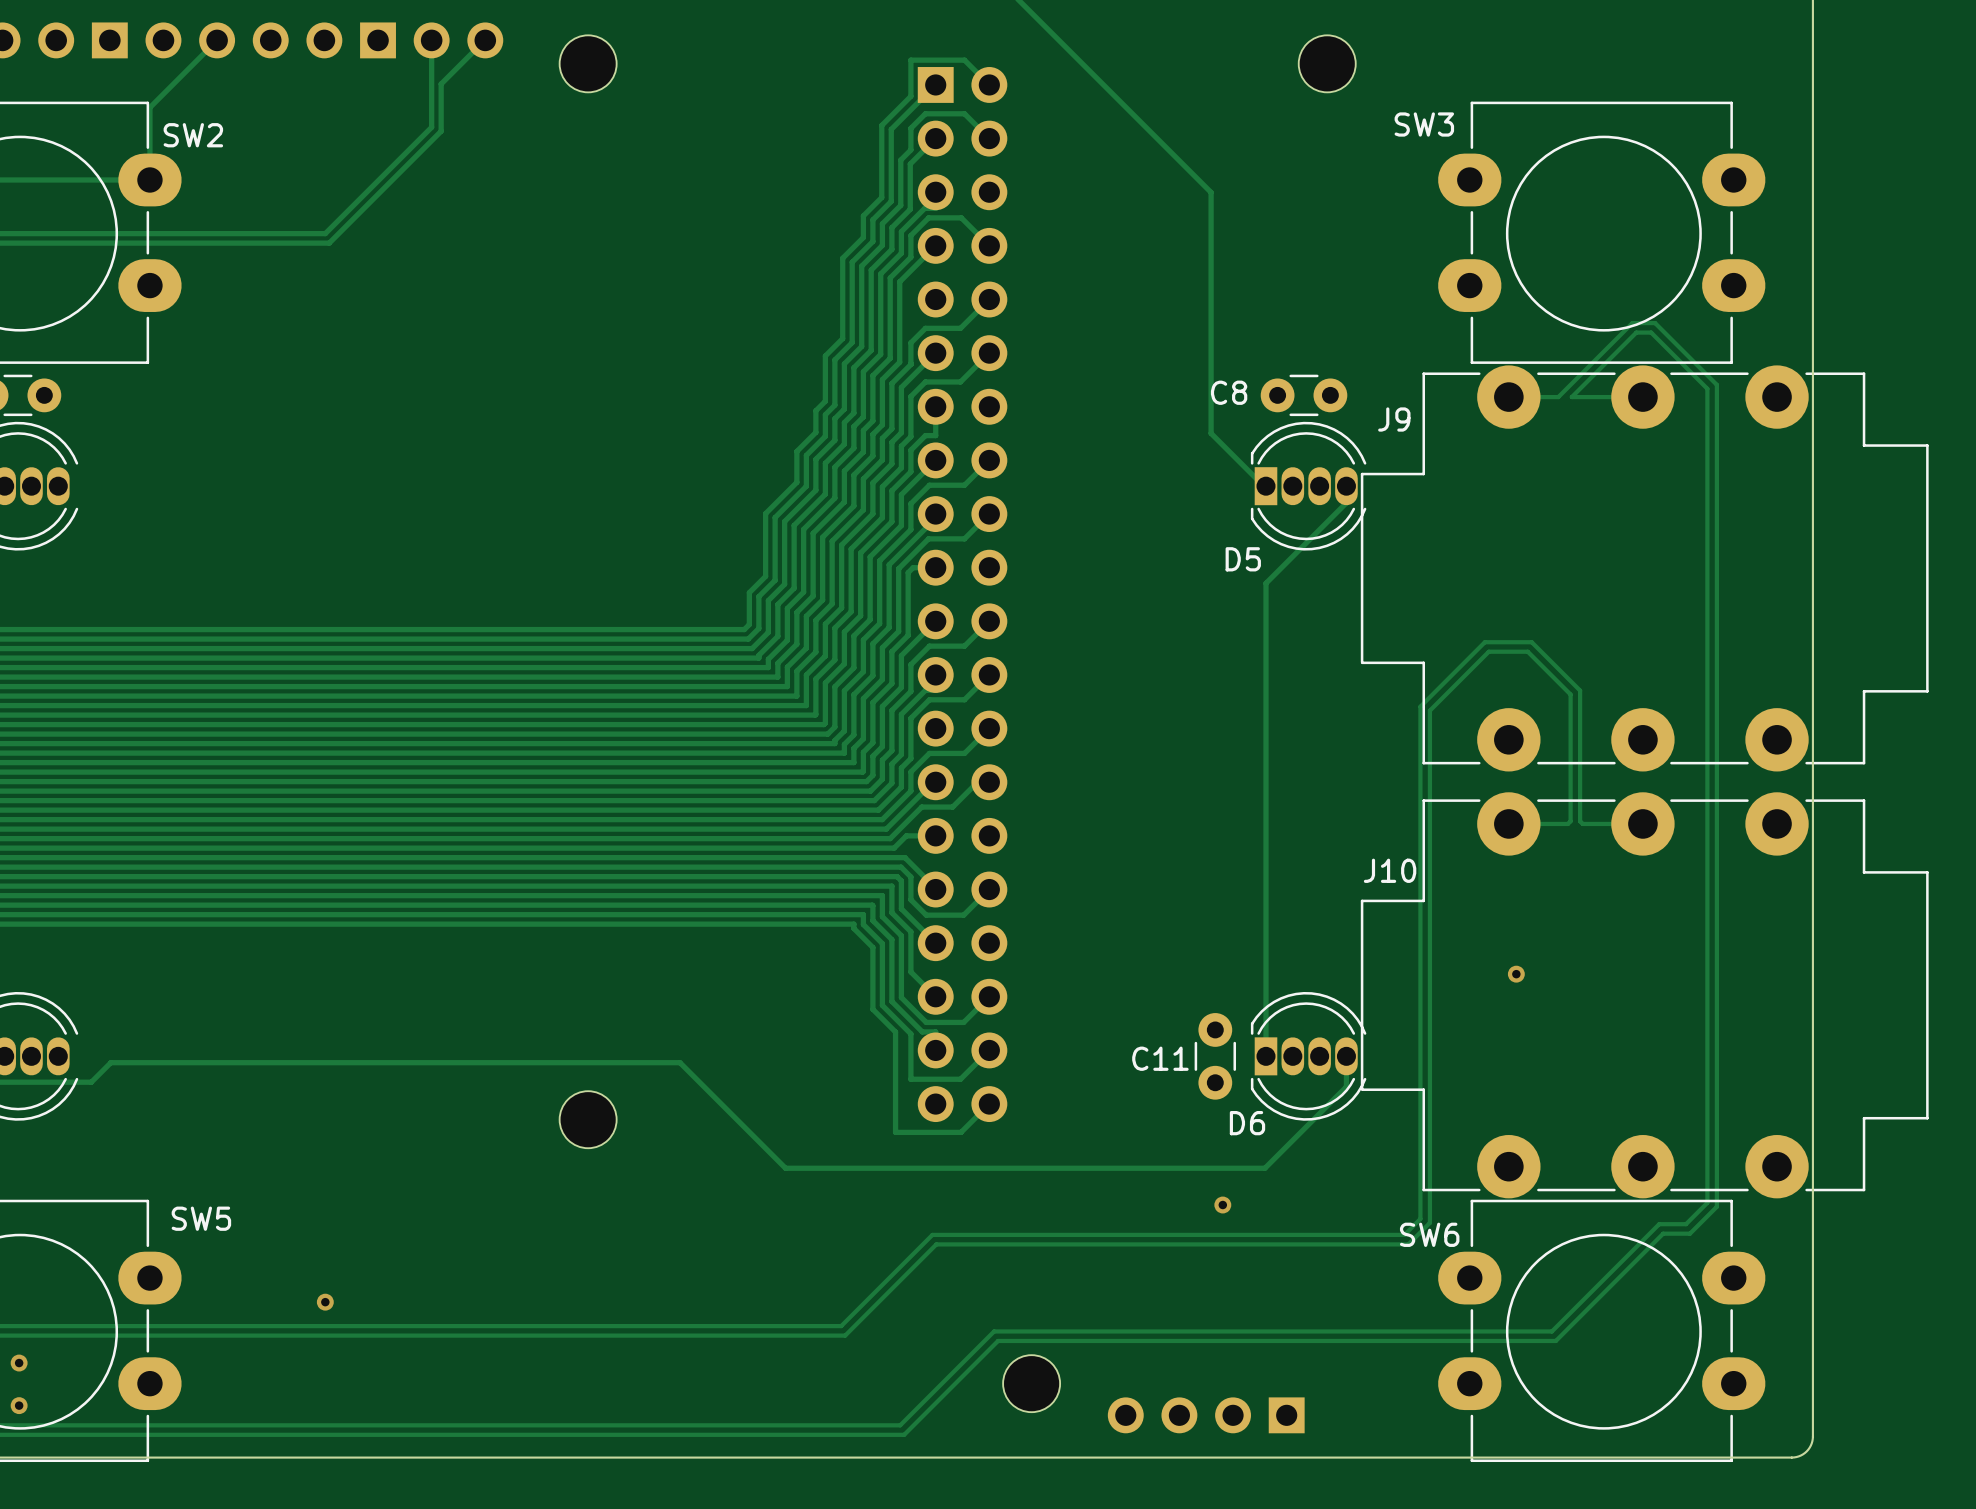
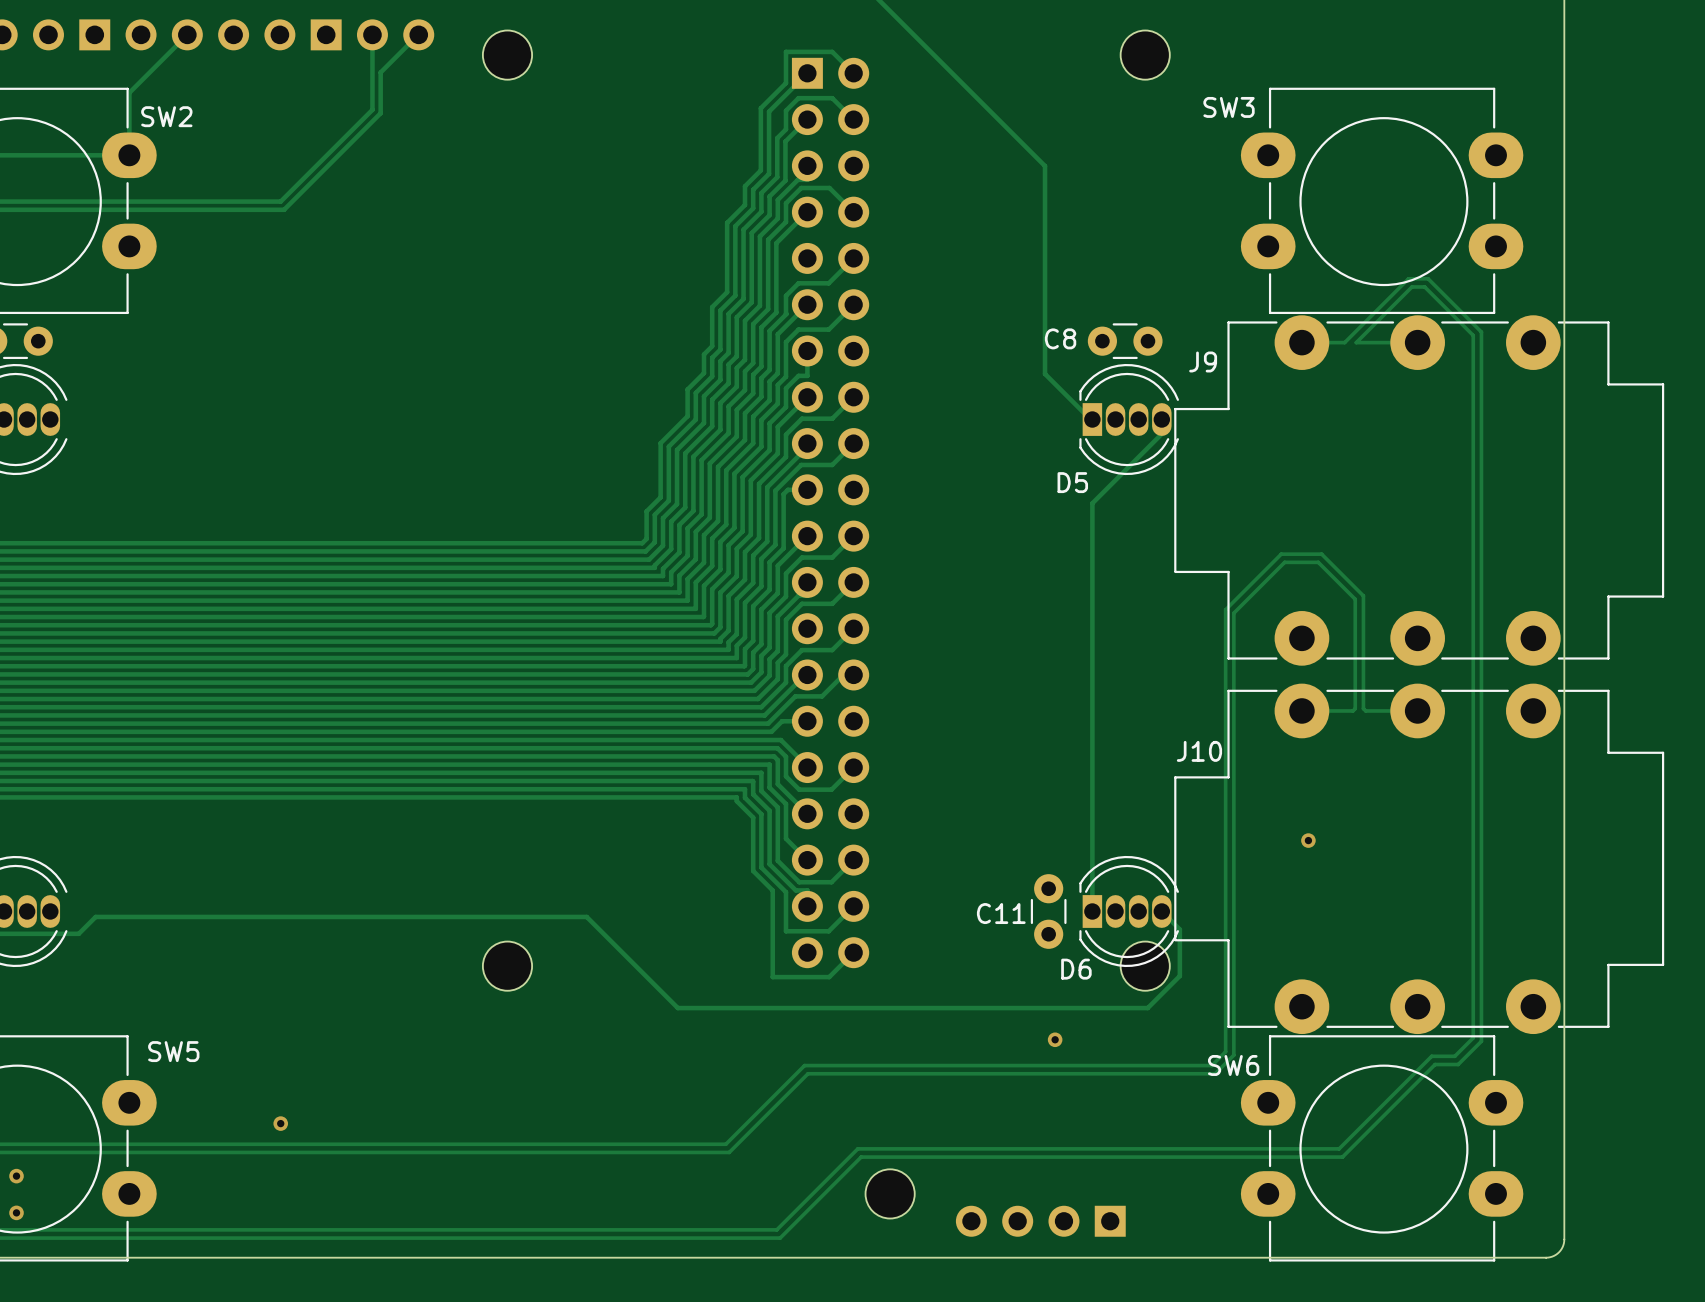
track: (1346, 1056) (1346, 1086) (1264, 1168) -> (1161, 911) (1179, 929) (1179, 975) (1147, 1008) (1091, 1008)
part: none -> (1145, 966)

